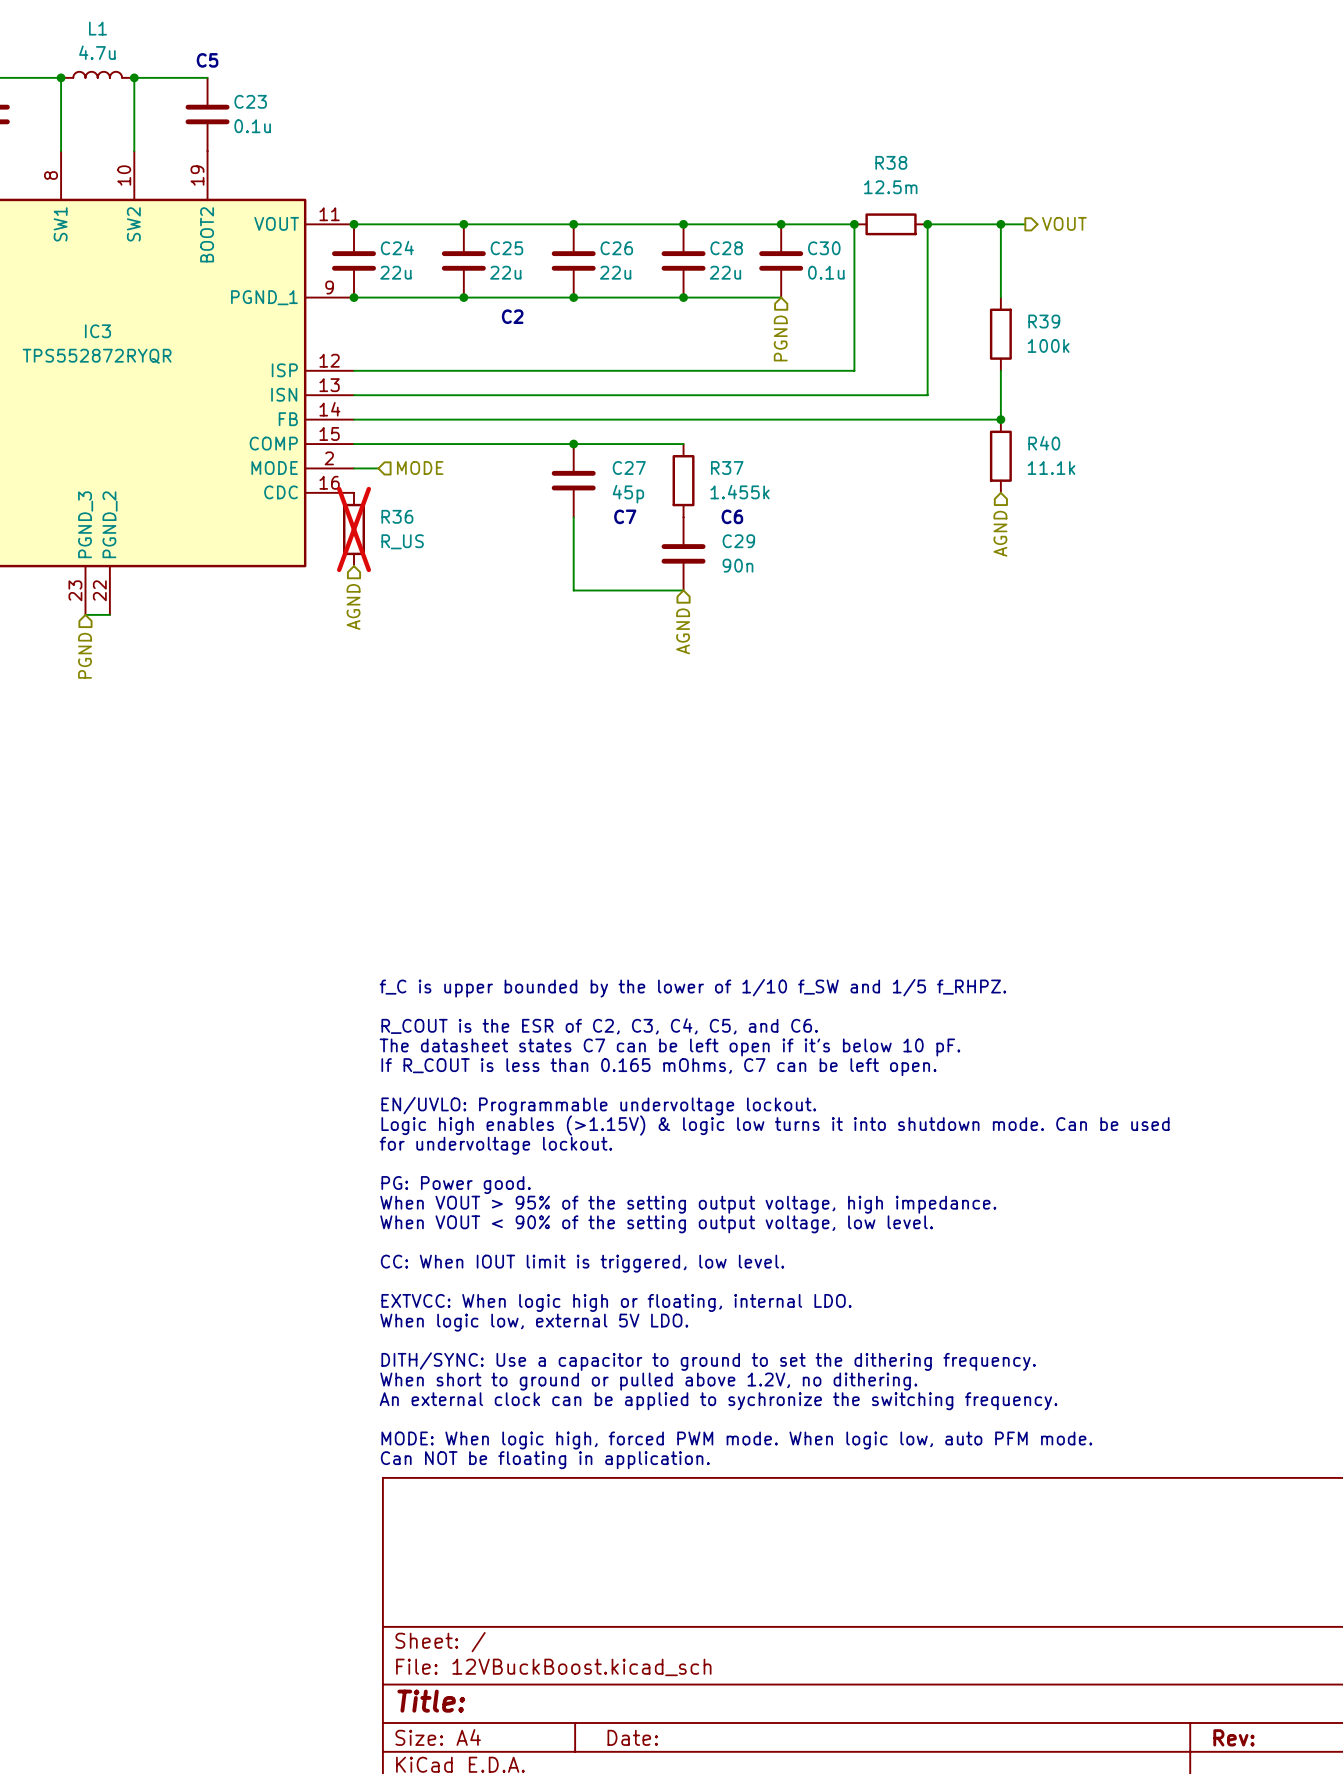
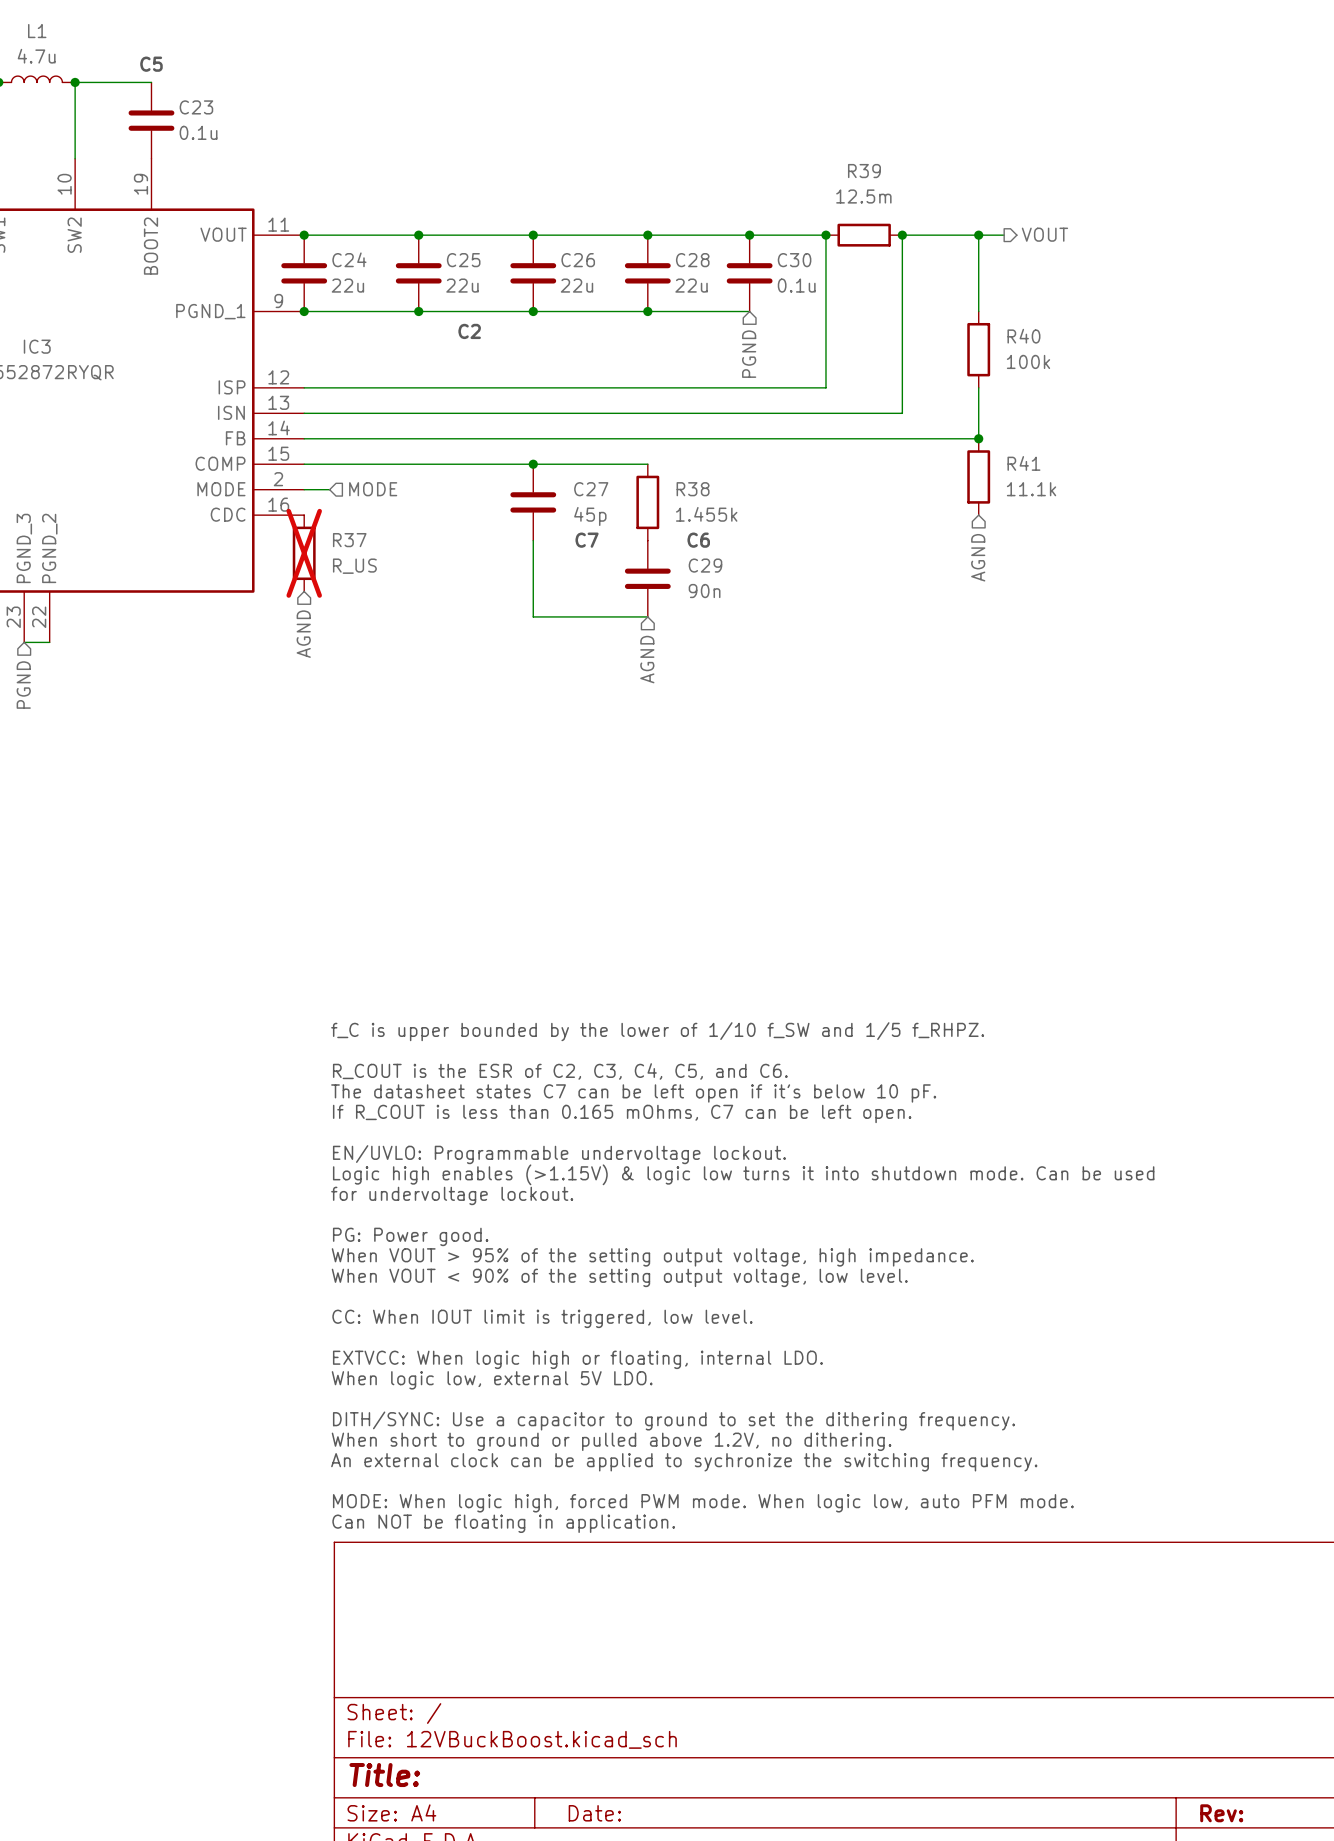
R38 name: R38 (891, 162) -> R39 (864, 171)
R39 name: R39 (1044, 321) -> R40 (1023, 336)
R40 name: R40 (1044, 443) -> R41 (1023, 463)
R37 name: R37 (727, 467) -> R38 (693, 489)
R36 name: R36 (397, 516) -> R37 (349, 540)

